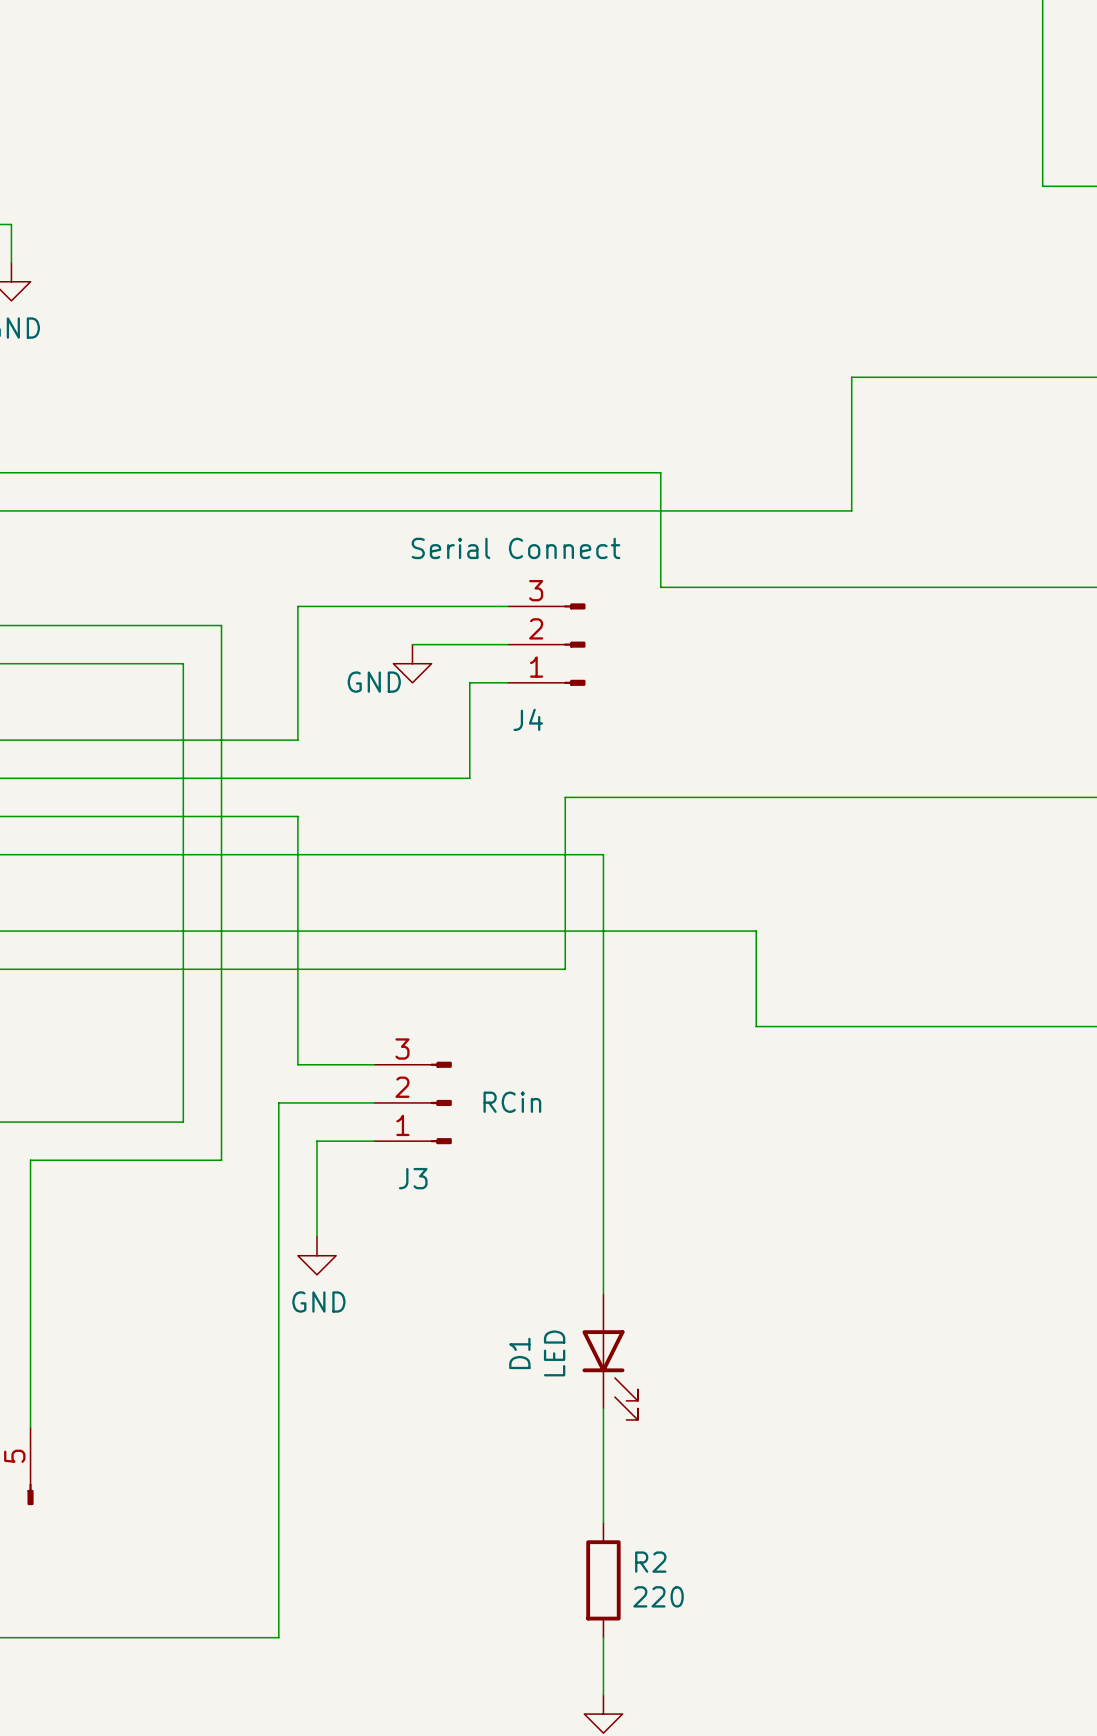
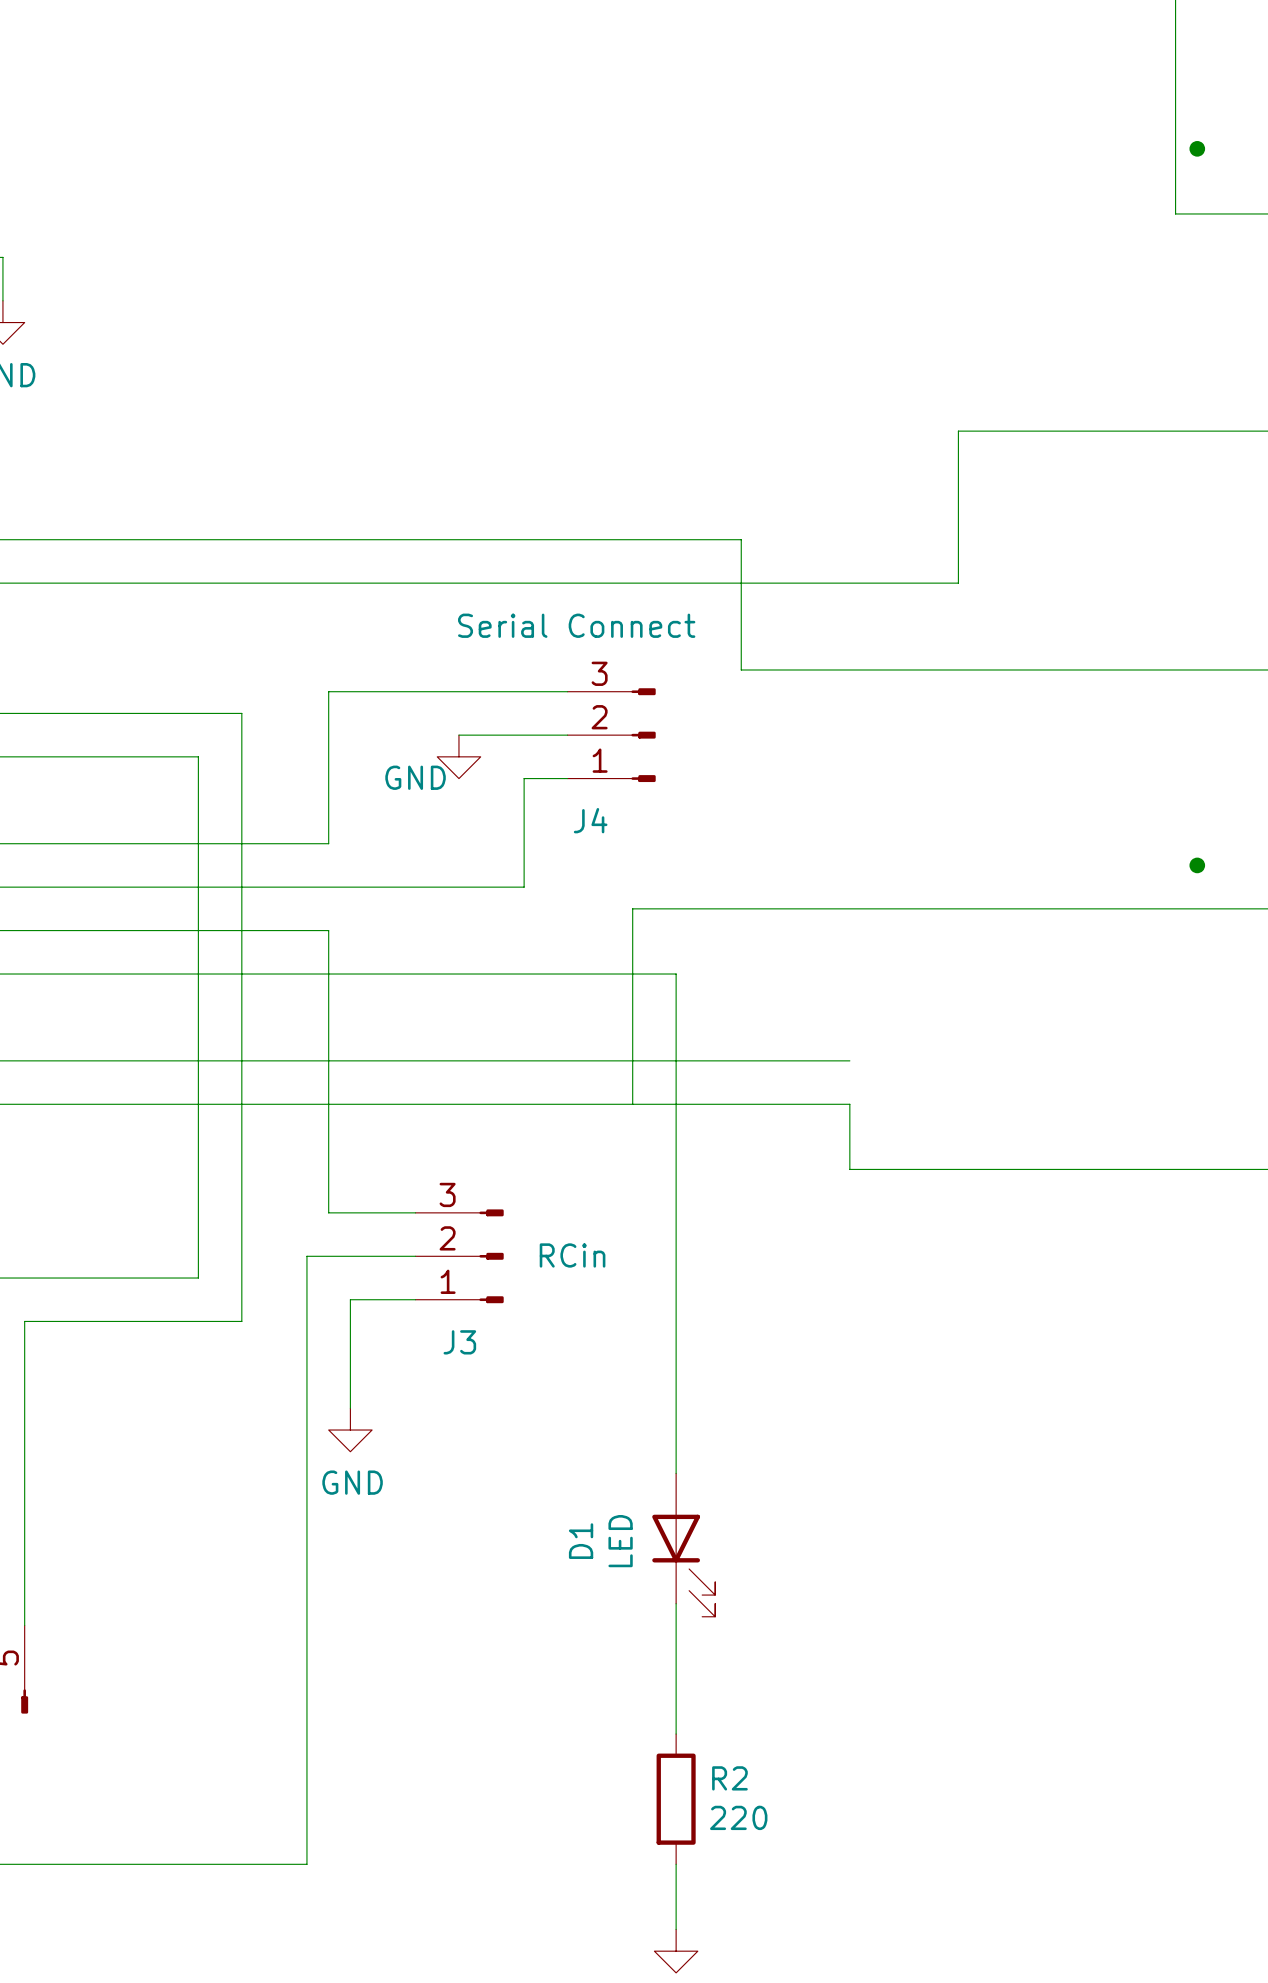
junction: none -> (1197, 148)
junction: none -> (1197, 865)
wire: (756, 931) (756, 969) -> (632, 1104) (849, 1104)

